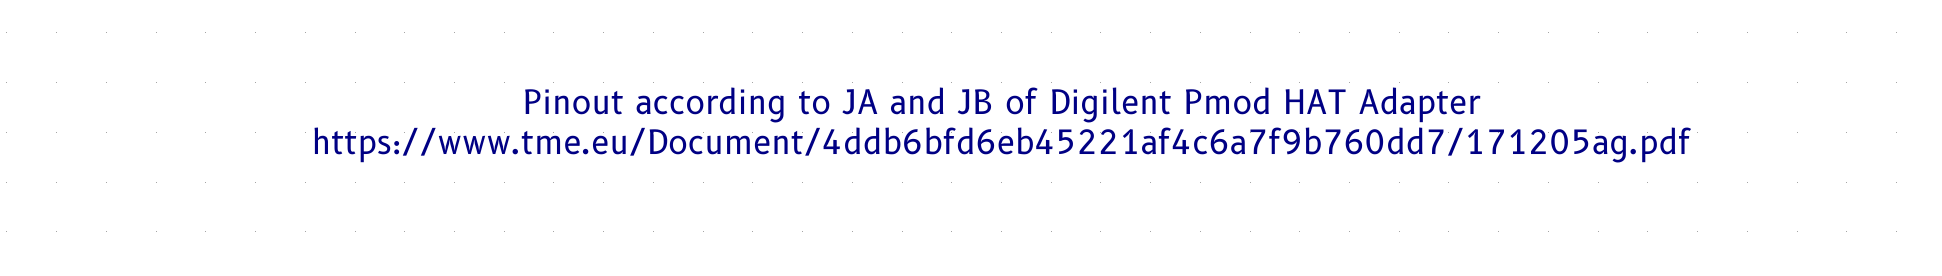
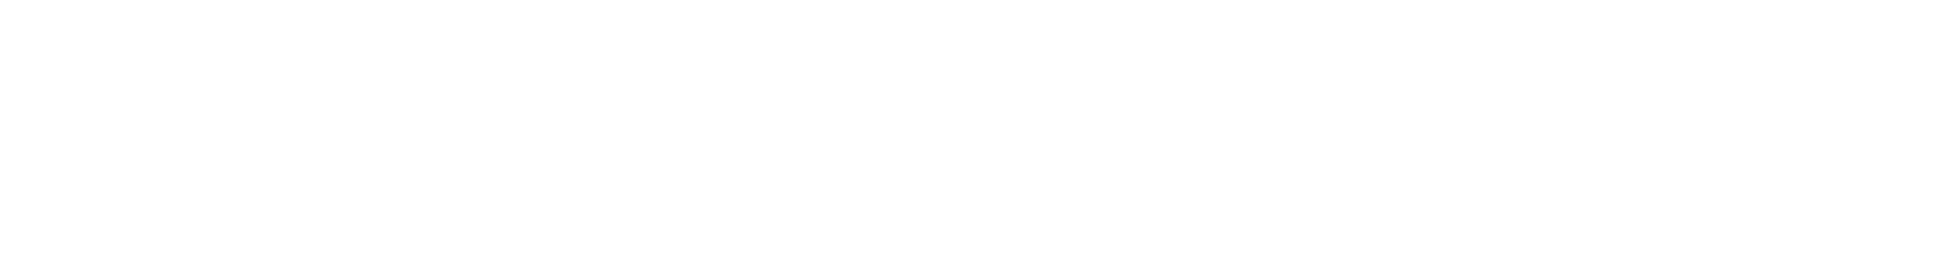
text: Pinout according to JA and JB of Digilent Pmod HAT Adapter (1002, 104) -> none
text: https://www.tme.eu/Document/4ddb6bfd6eb45221af4c6a7f9b760dd7/171205ag.pdf (1002, 145) -> none

